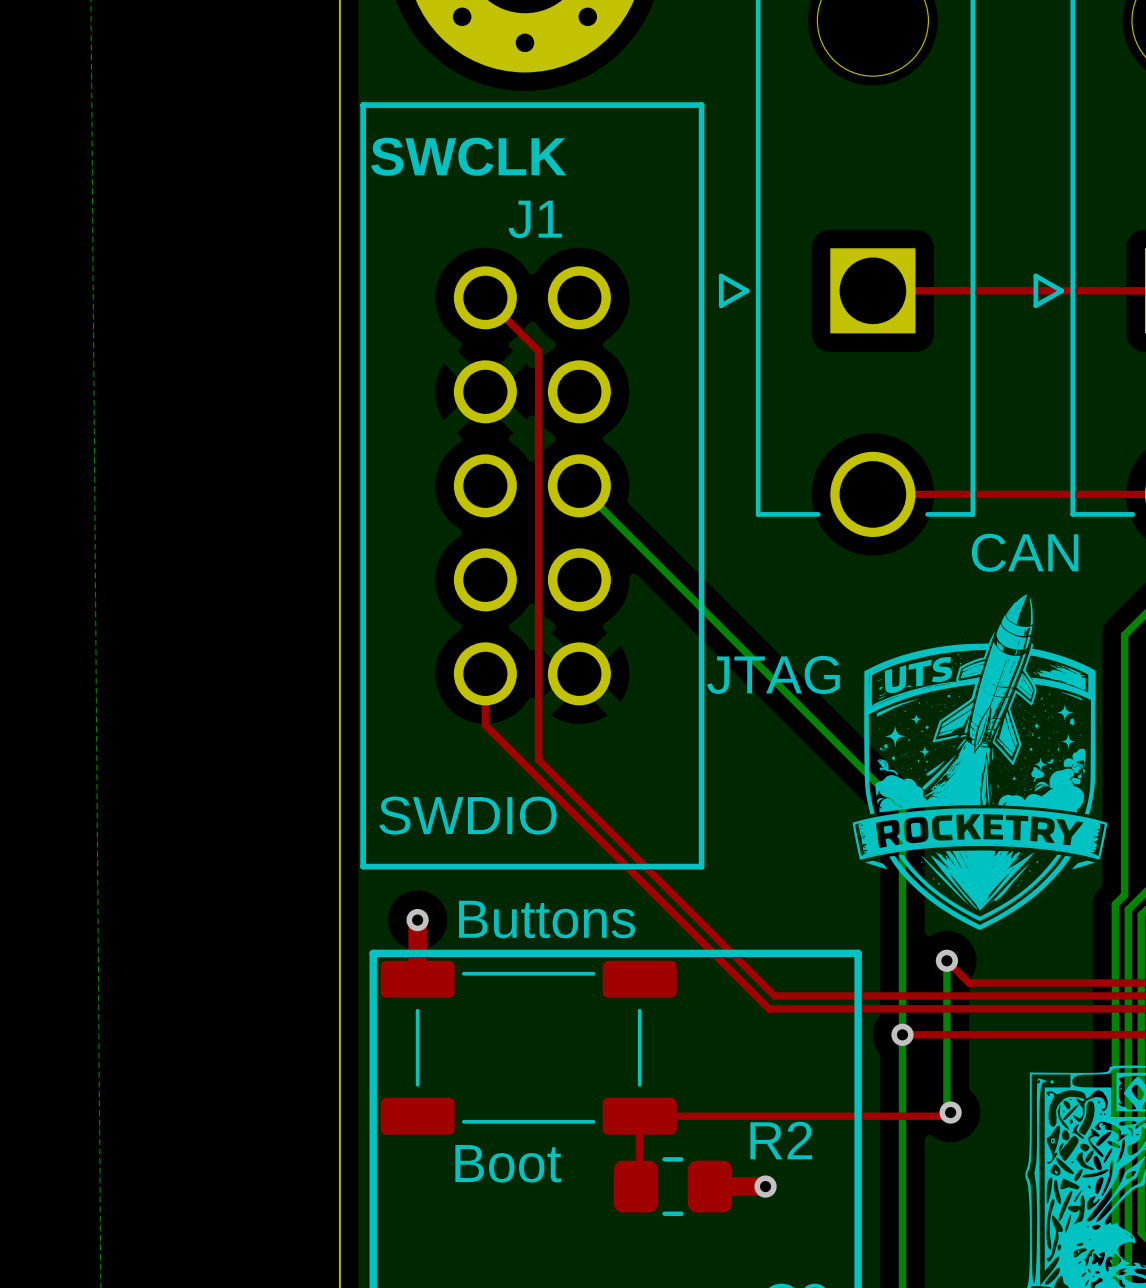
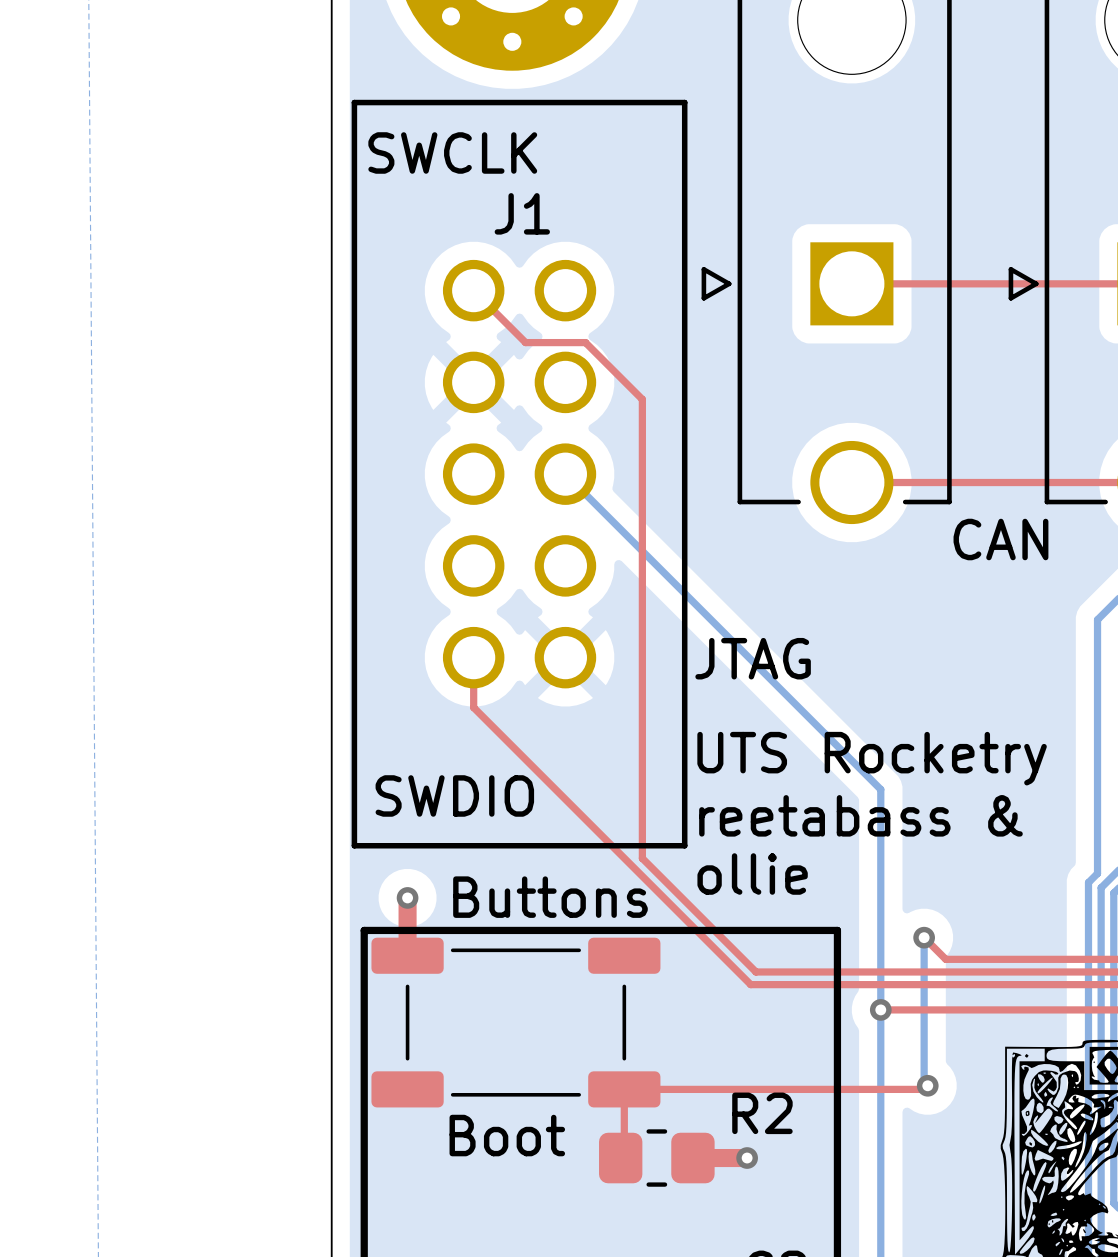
top track: (538, 351) (538, 759) (658, 879) -> (525, 342) (585, 342) (642, 399) (642, 858)
drawing: [848, 590, 1113, 936] -> none
text: none -> UTS Rocketry (872, 758)
text: none -> reetabass & (860, 815)
text: none -> ollie (752, 874)

